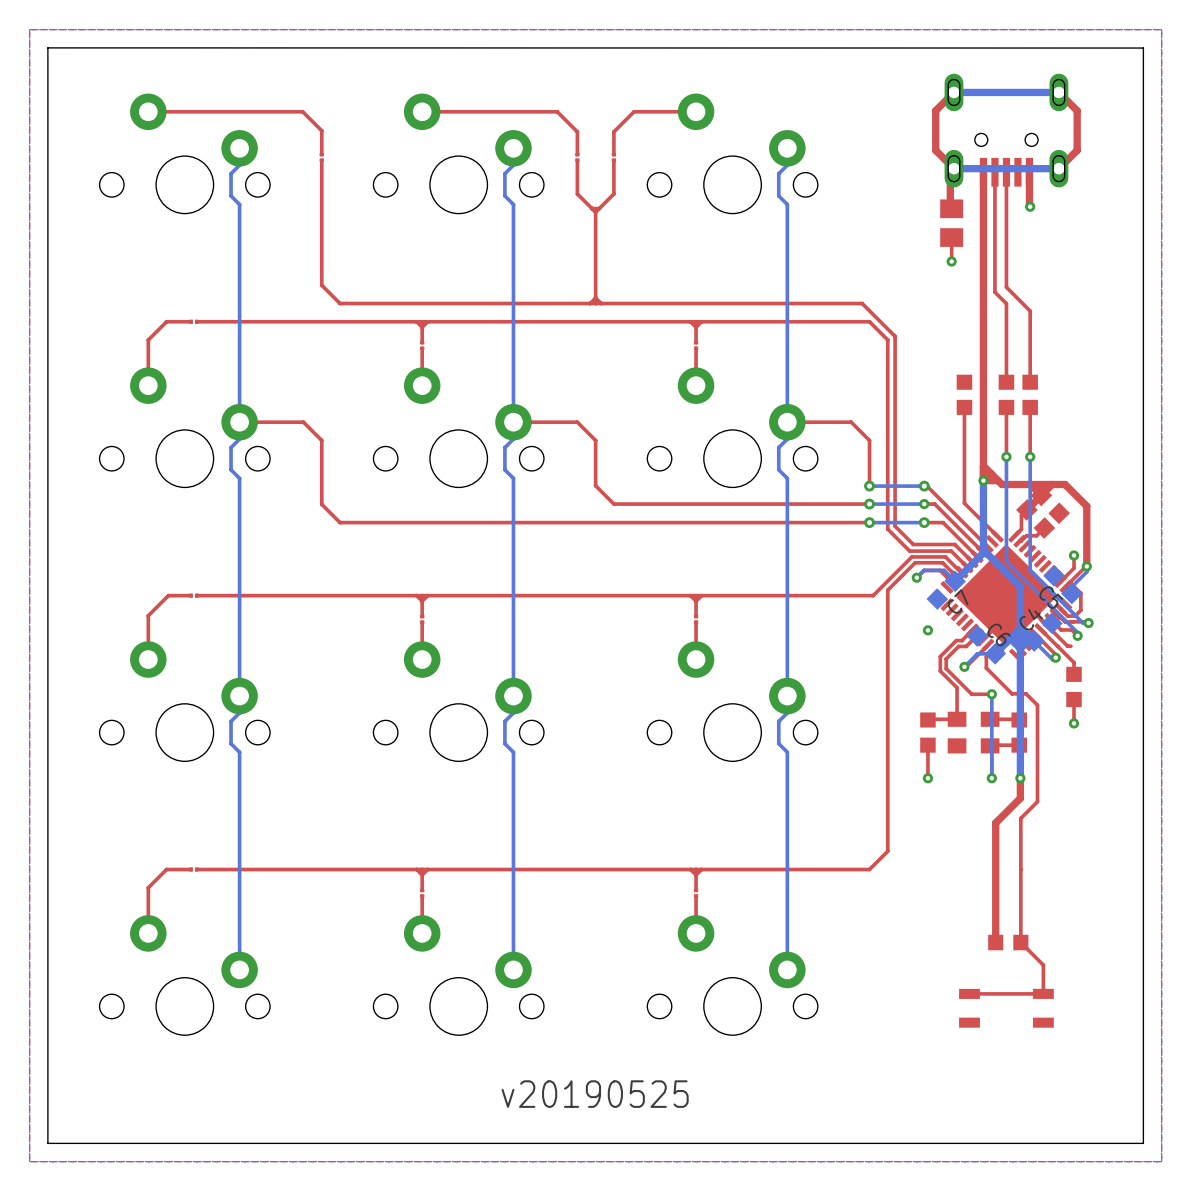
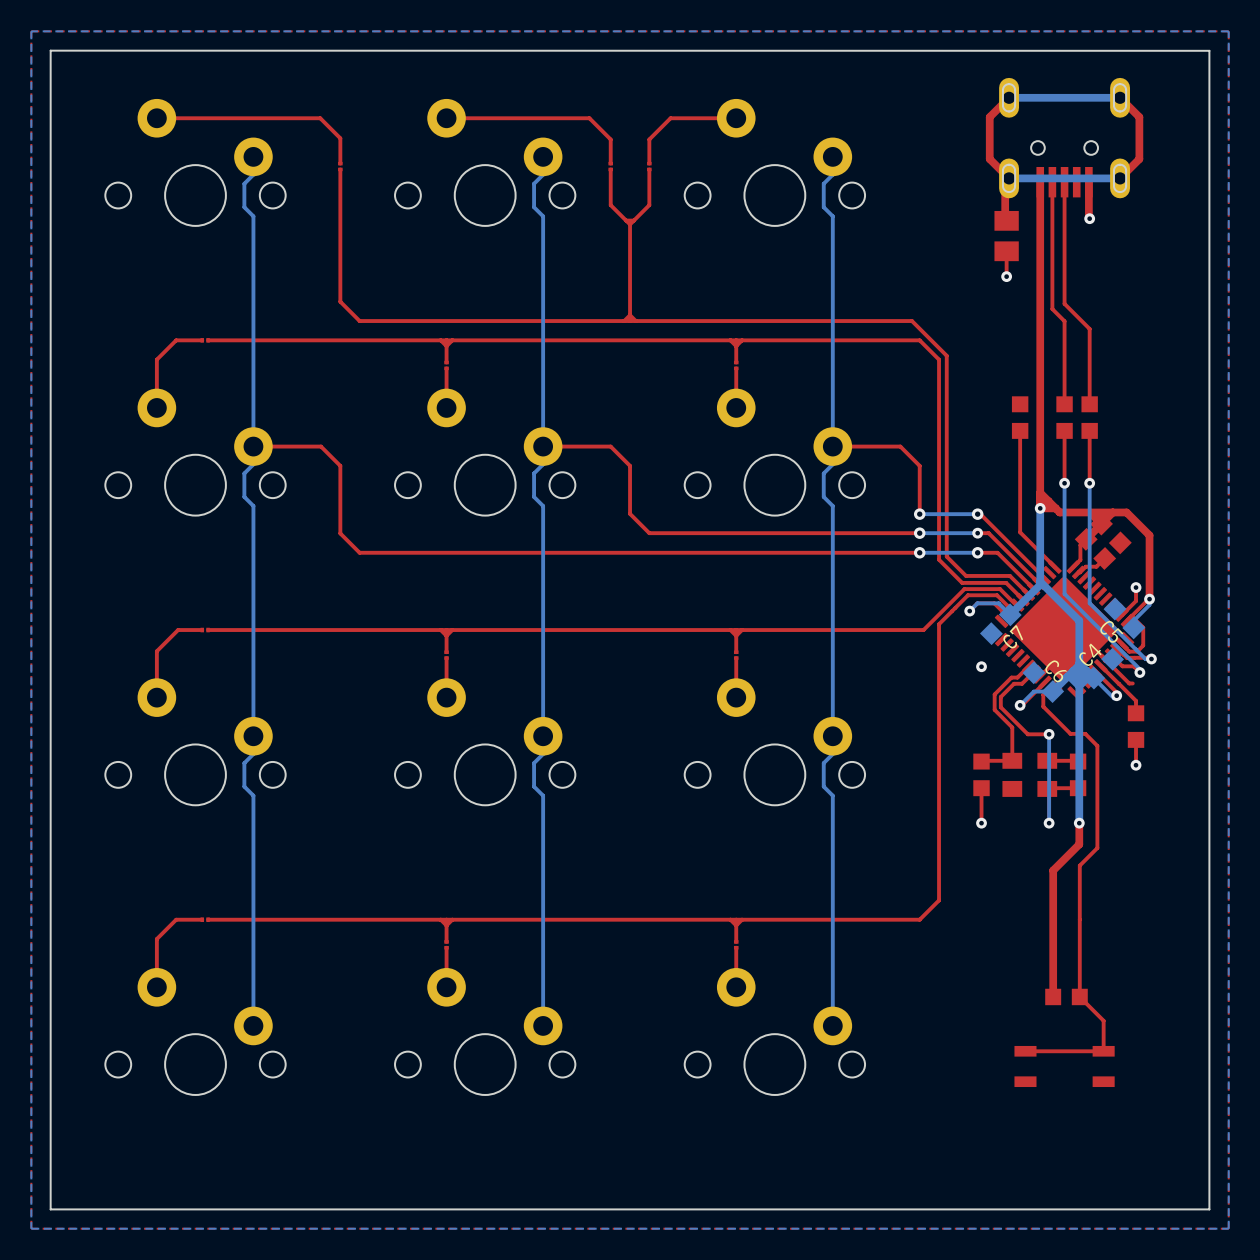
text: v20190525 (595, 1094) -> none

